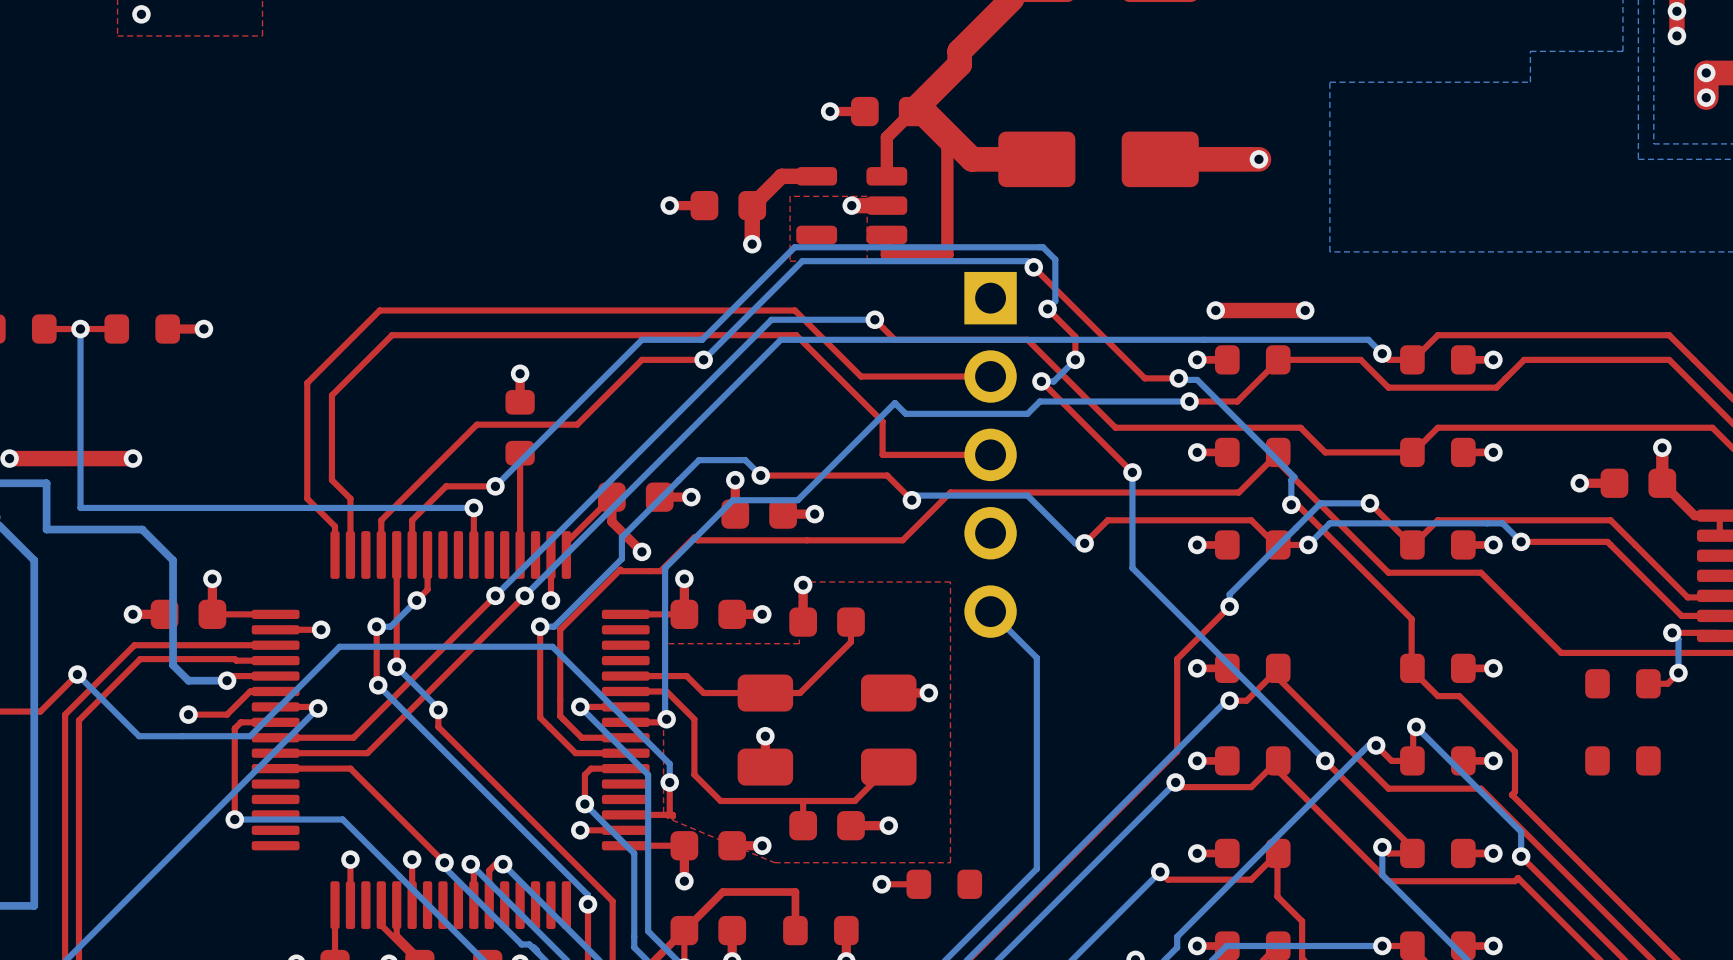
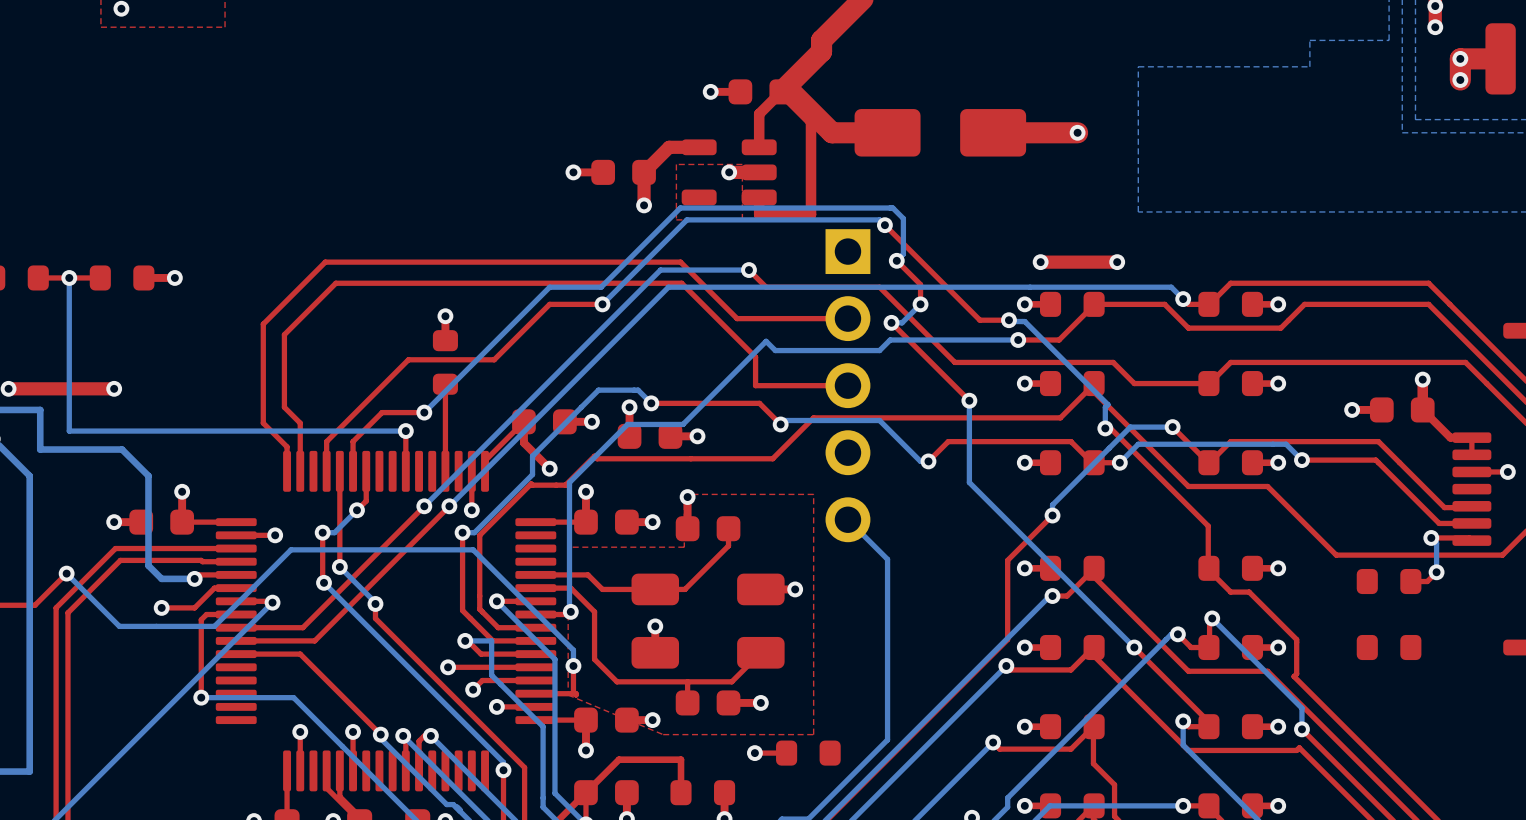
bottom track: none -> (465, 640) (491, 640) (491, 675) (500, 684)
via: none -> (465, 640)
top track: (591, 768) (584, 774) (584, 804) -> (506, 654) (481, 654) (467, 640) (465, 640)
via: none -> (448, 667)
top track: none -> (535, 667) (448, 667)
top track: none -> (535, 680) (482, 680) (473, 689)
via: (584, 804) -> none
via: none -> (473, 689)

